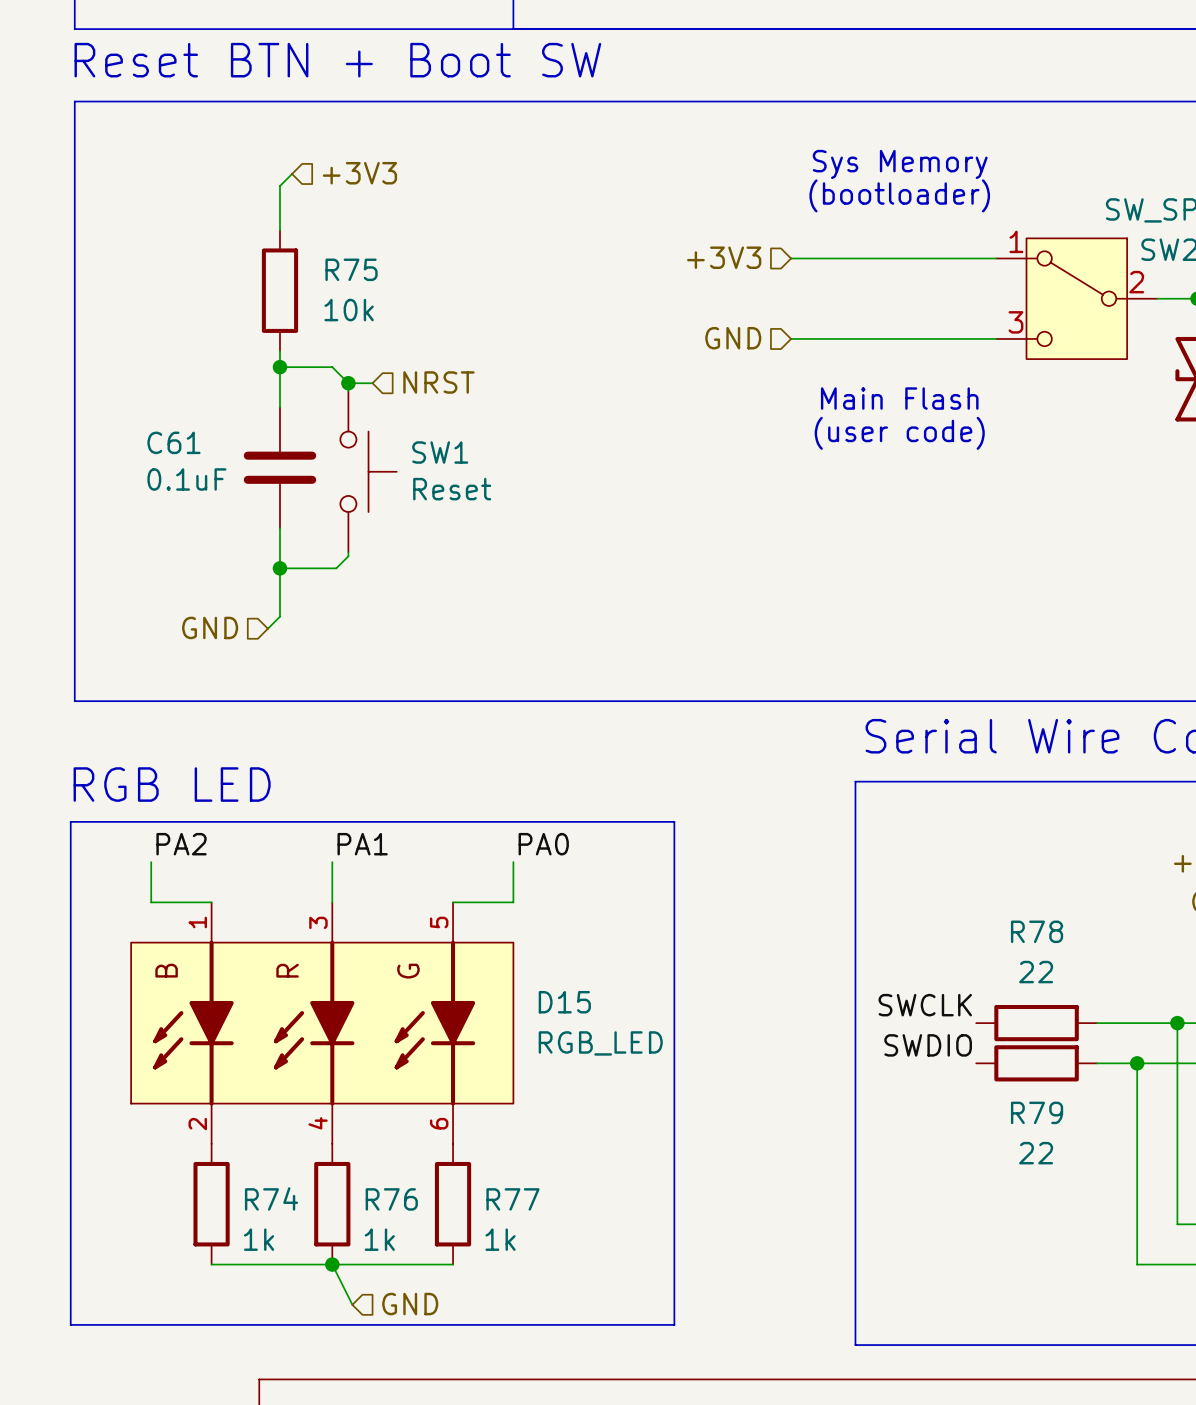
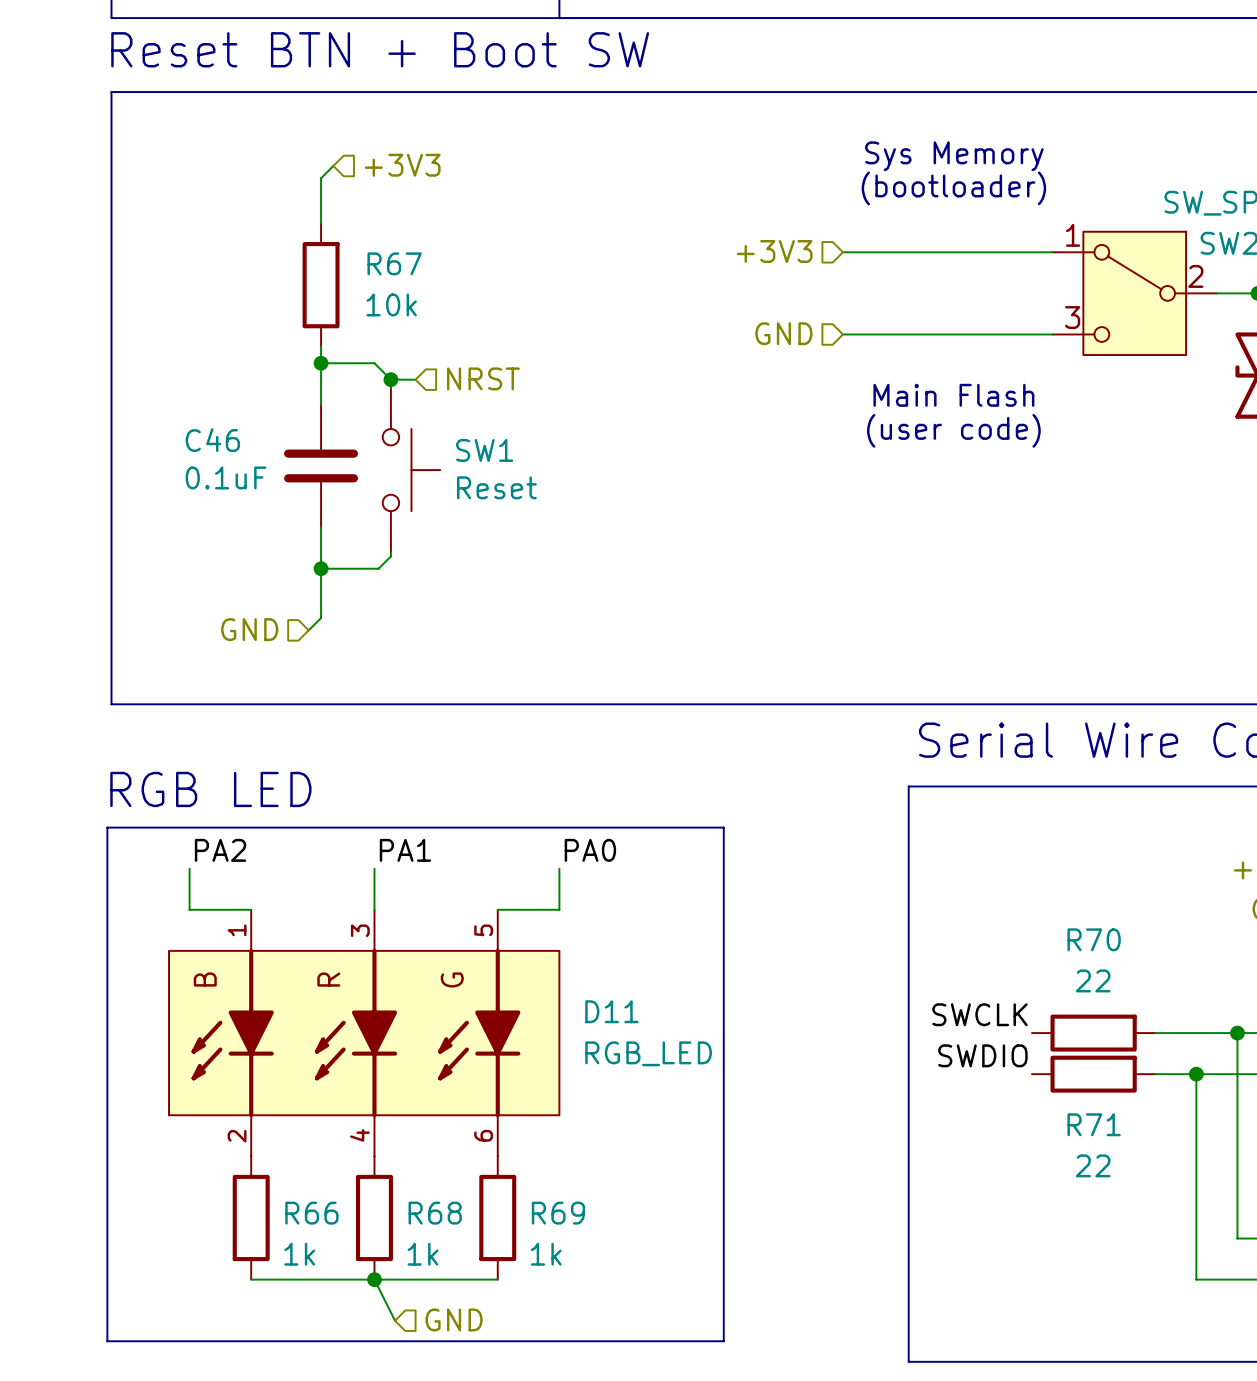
R75 name: R75 (351, 269) -> R67 (394, 263)
C61 name: C61 (173, 442) -> C46 (212, 440)
R78 name: R78 (1037, 931) -> R70 (1094, 939)
D15 name: D15 (564, 1002) -> D11 (611, 1011)
R79 name: R79 (1037, 1112) -> R71 (1094, 1124)
R74 name: R74 (271, 1198) -> R66 (311, 1213)
R76 name: R76 (391, 1199) -> R68 (435, 1213)
R77 name: R77 (512, 1199) -> R69 (558, 1213)

